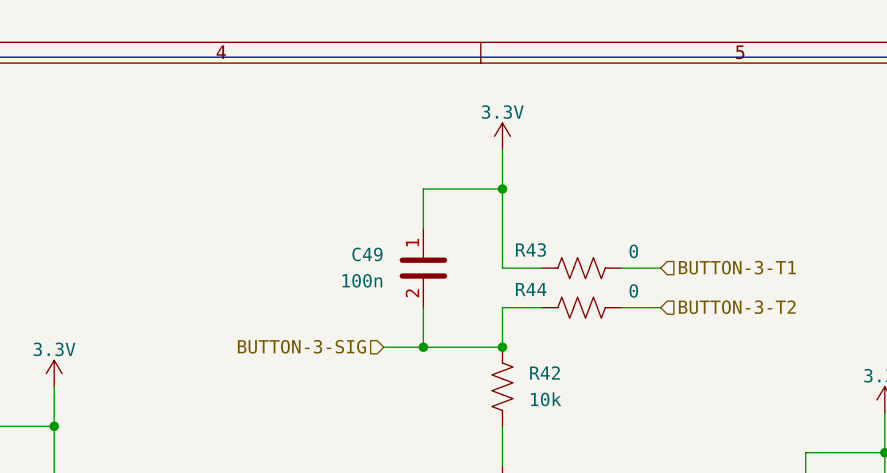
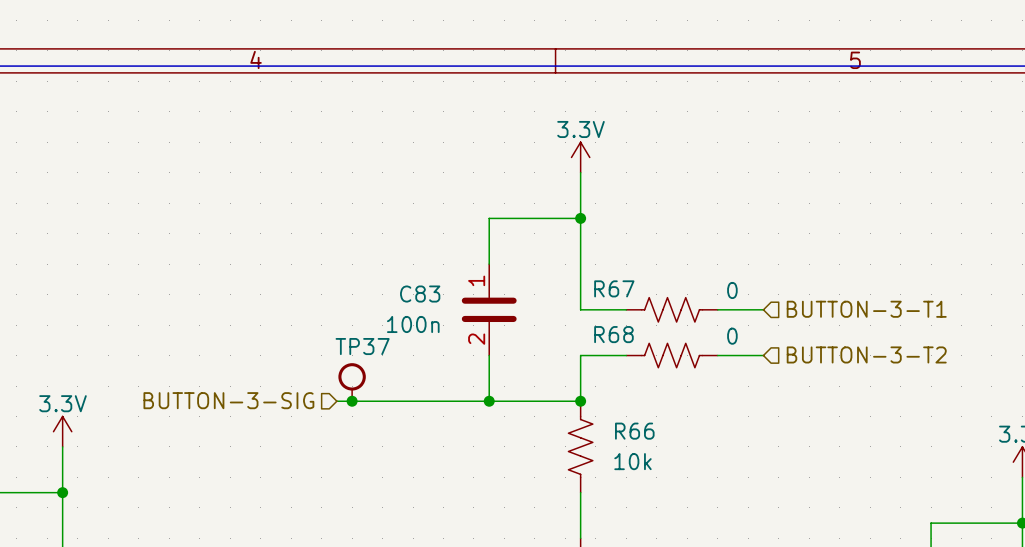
R43 name: R43 (530, 250) -> R67 (614, 288)
C49 name: C49 (367, 254) -> C83 (420, 294)
R44 name: R44 (531, 289) -> R68 (613, 334)
TP37: none -> (352, 382)
hierarchical label position: BUTTON-3-SIG (301, 346) -> BUTTON-3-SIG (228, 400)
wire: none -> (336, 401) (443, 401)
junction: none -> (352, 401)
R42 name: R42 (545, 372) -> R66 (634, 431)

